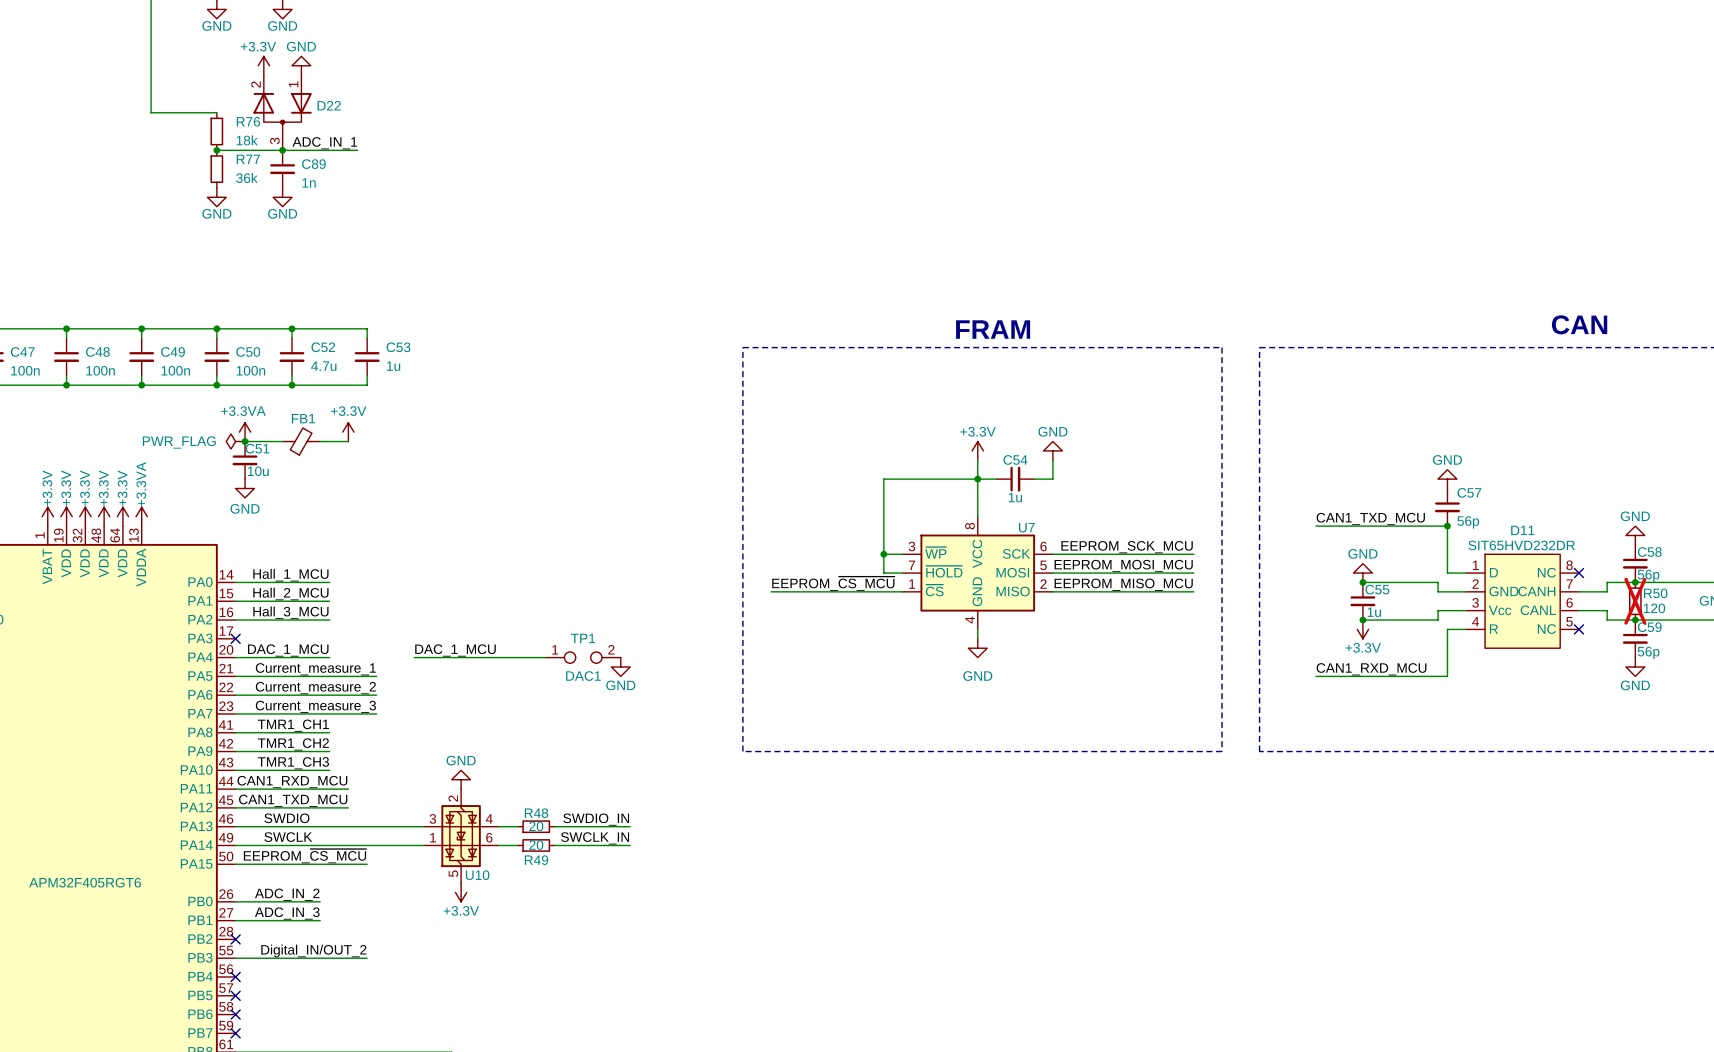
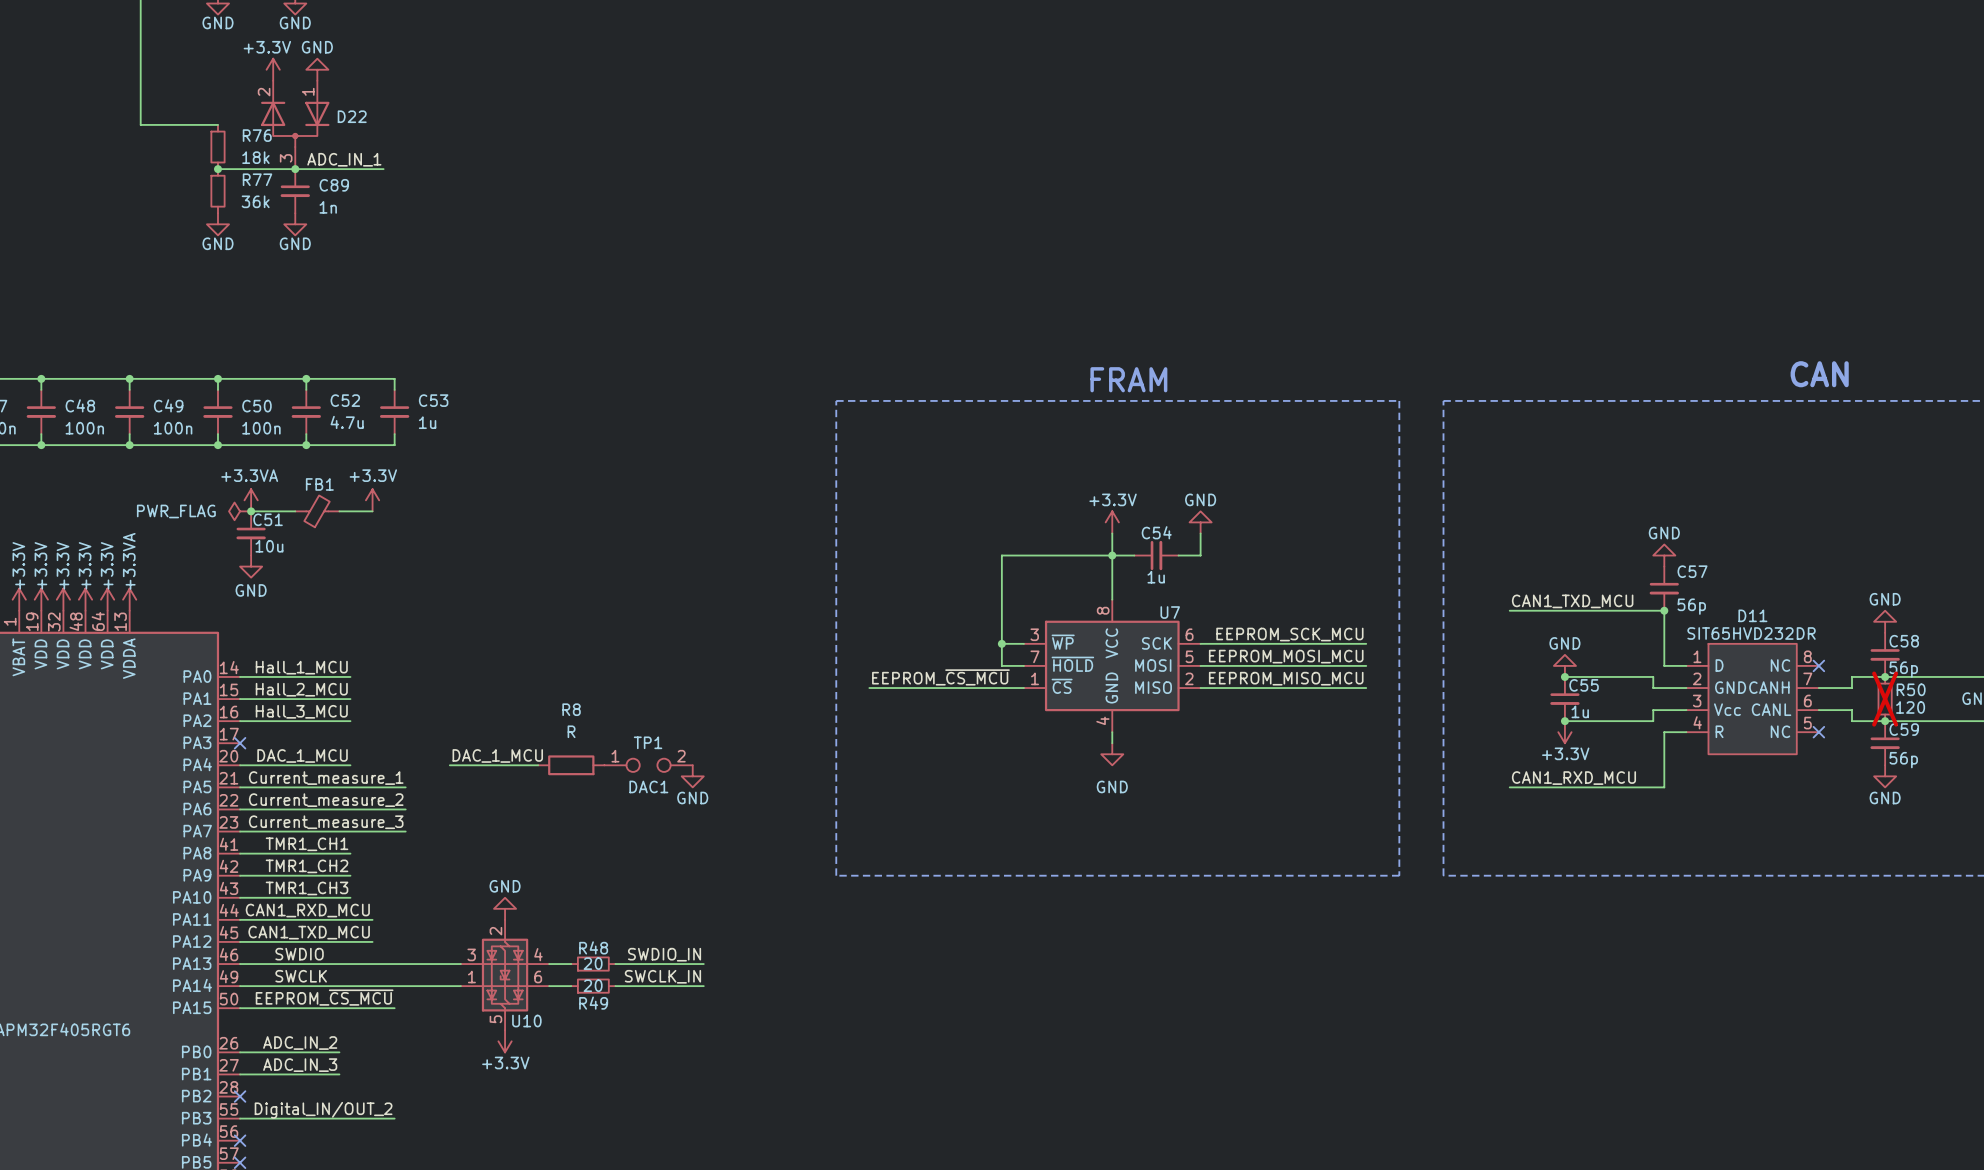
wire: (489, 657) (545, 657) -> none
R8: none -> R (571, 765)

